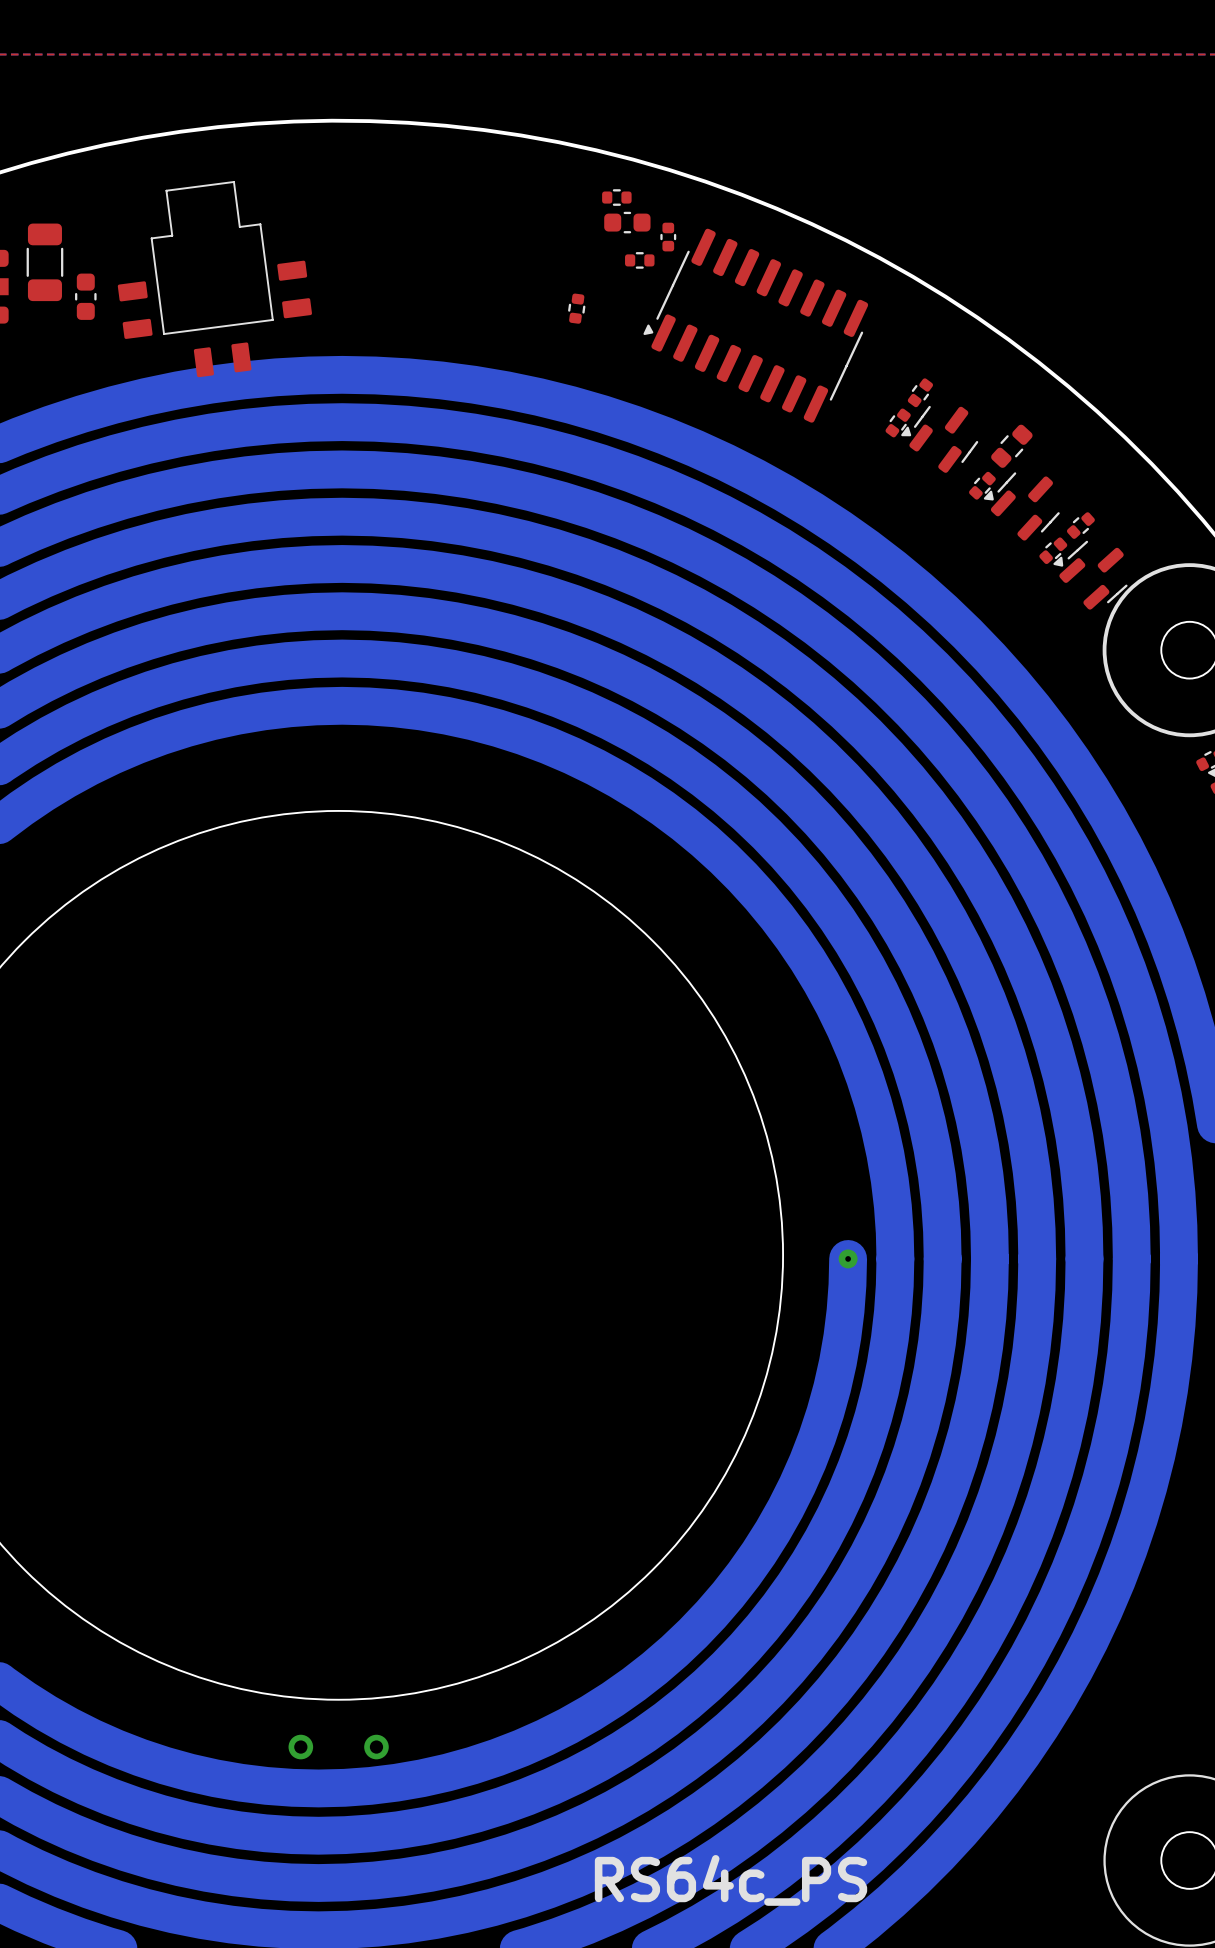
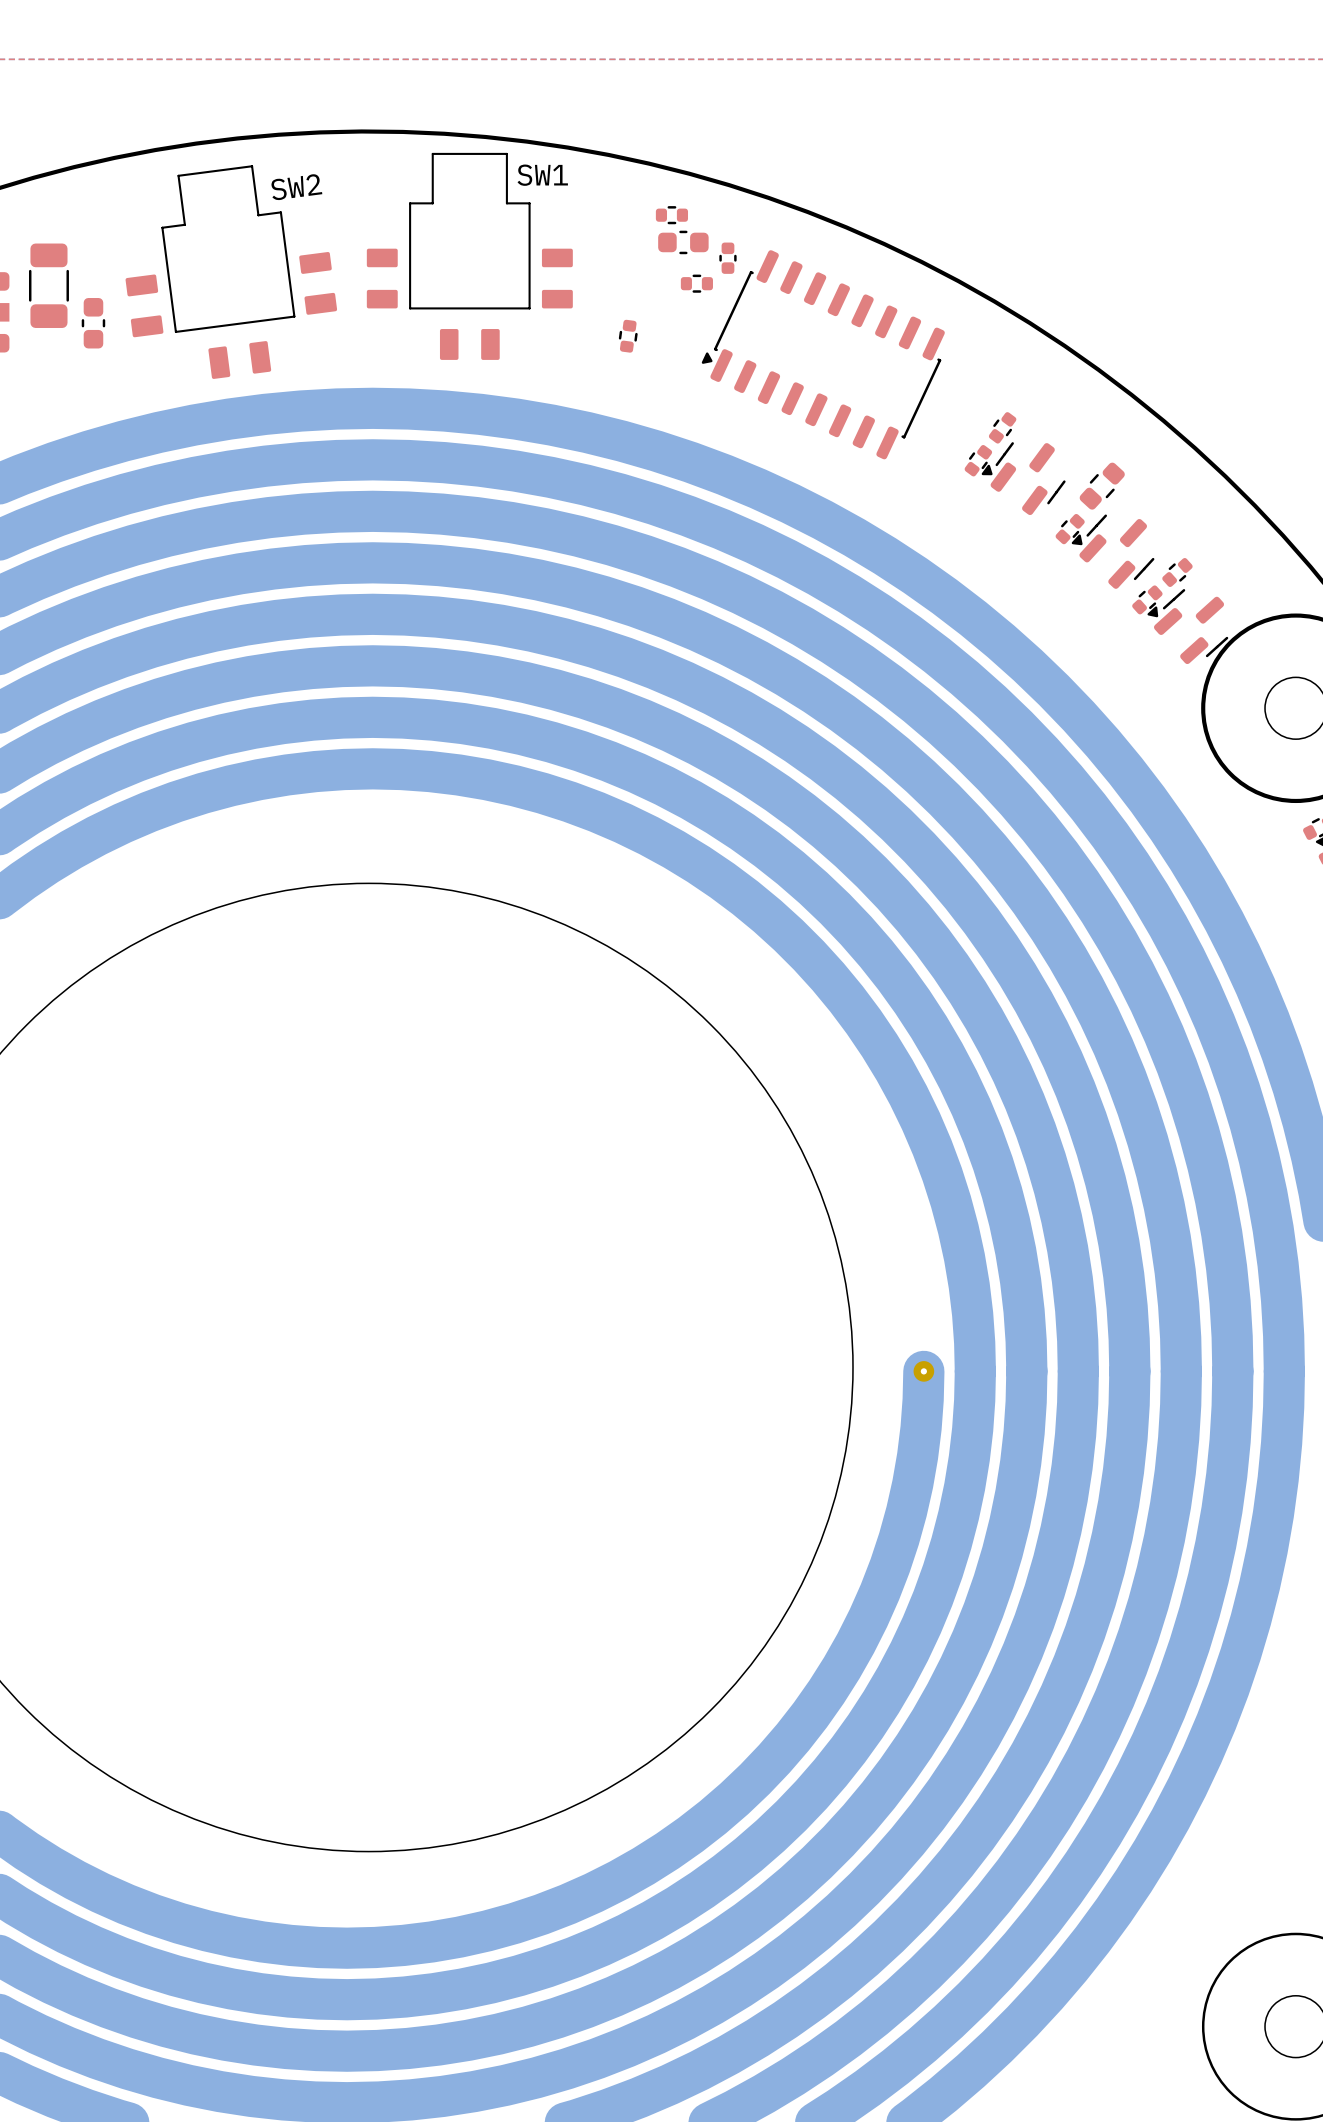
part footprint: [643, 228, 869, 423] -> [701, 250, 945, 460]
SW1: none -> (469, 256)
SW2: none -> (231, 272)
part: (214, 279) -> none
part: (300, 1747) -> none
part: (376, 1747) -> none
text: RS64c_PS (731, 1880) -> none

